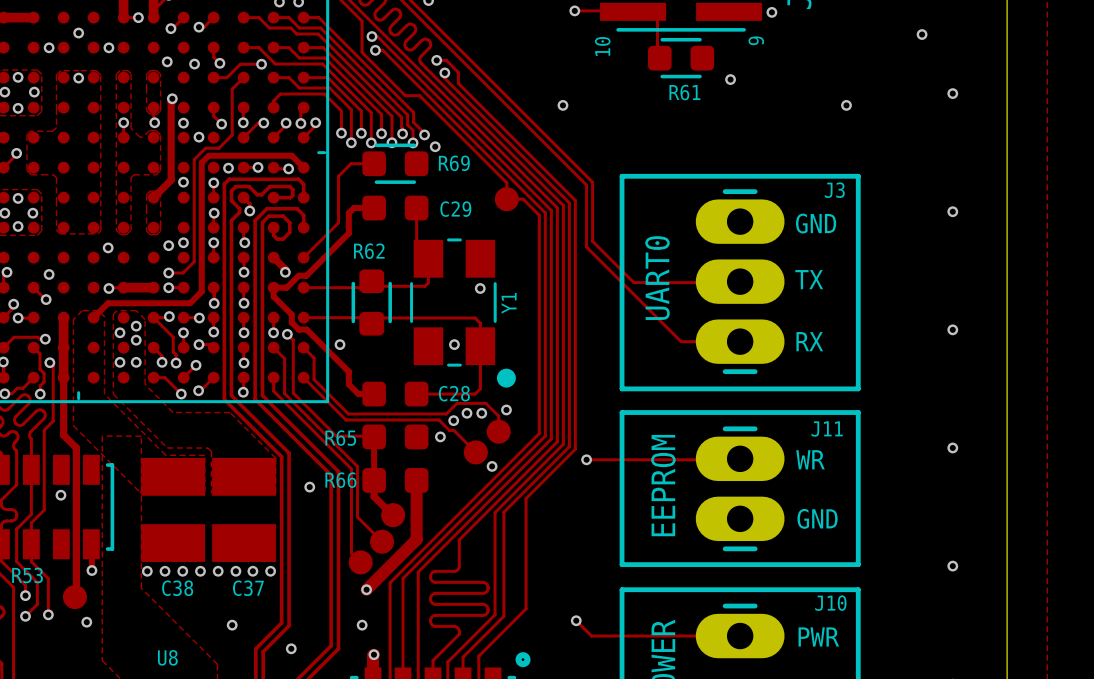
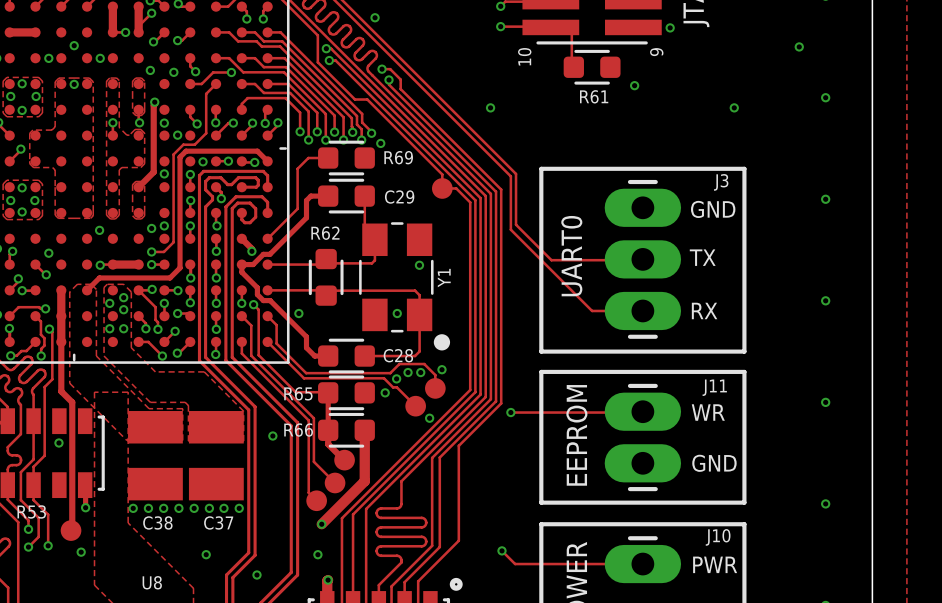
C29 footprint: [362, 195, 429, 221] -> [318, 178, 375, 214]
C28 footprint: [362, 381, 429, 407] -> [318, 338, 375, 374]
R66 footprint: [362, 424, 429, 450] -> [318, 375, 375, 411]
R65 footprint: [362, 468, 429, 493] -> [318, 412, 375, 448]

